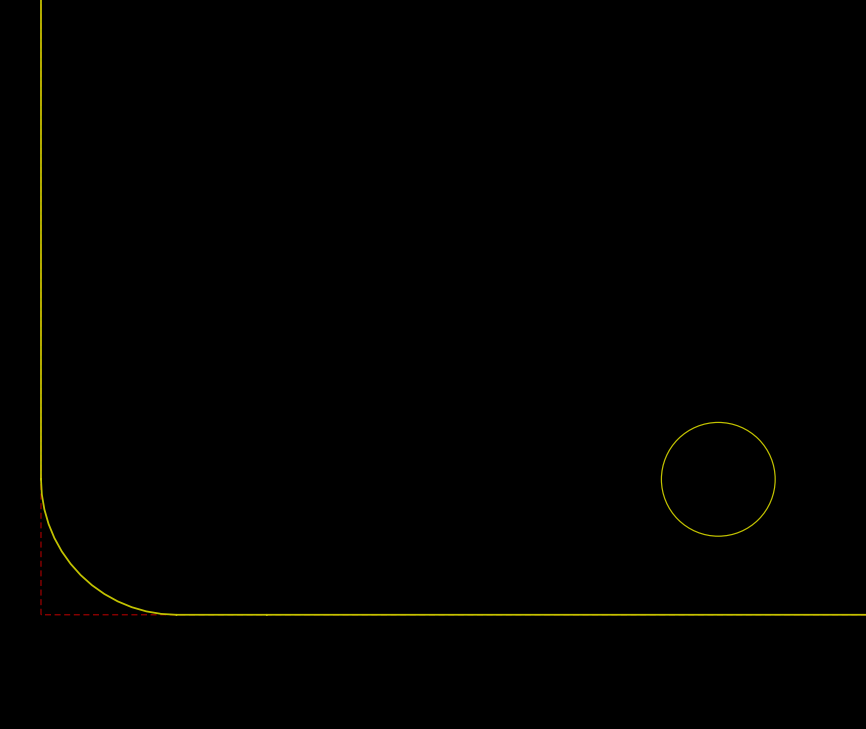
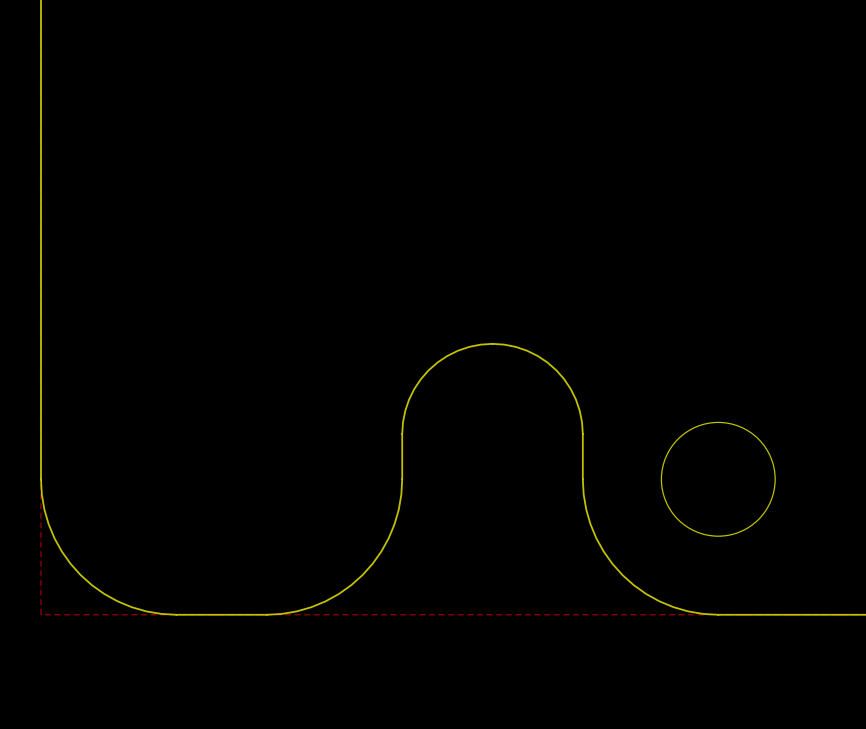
board edge: (266, 614) (718, 614) -> (266, 614) (296, 611) (325, 601) (351, 585) (372, 563) (388, 538) (398, 509) (402, 479) (402, 422) (405, 410) (414, 389) (428, 370) (447, 355) (469, 346) (492, 343) (515, 346) (537, 355) (556, 370) (570, 389) (575, 399) (582, 422) (582, 479) (586, 509) (596, 538) (612, 563) (633, 585) (659, 601) (688, 611) (718, 614)

